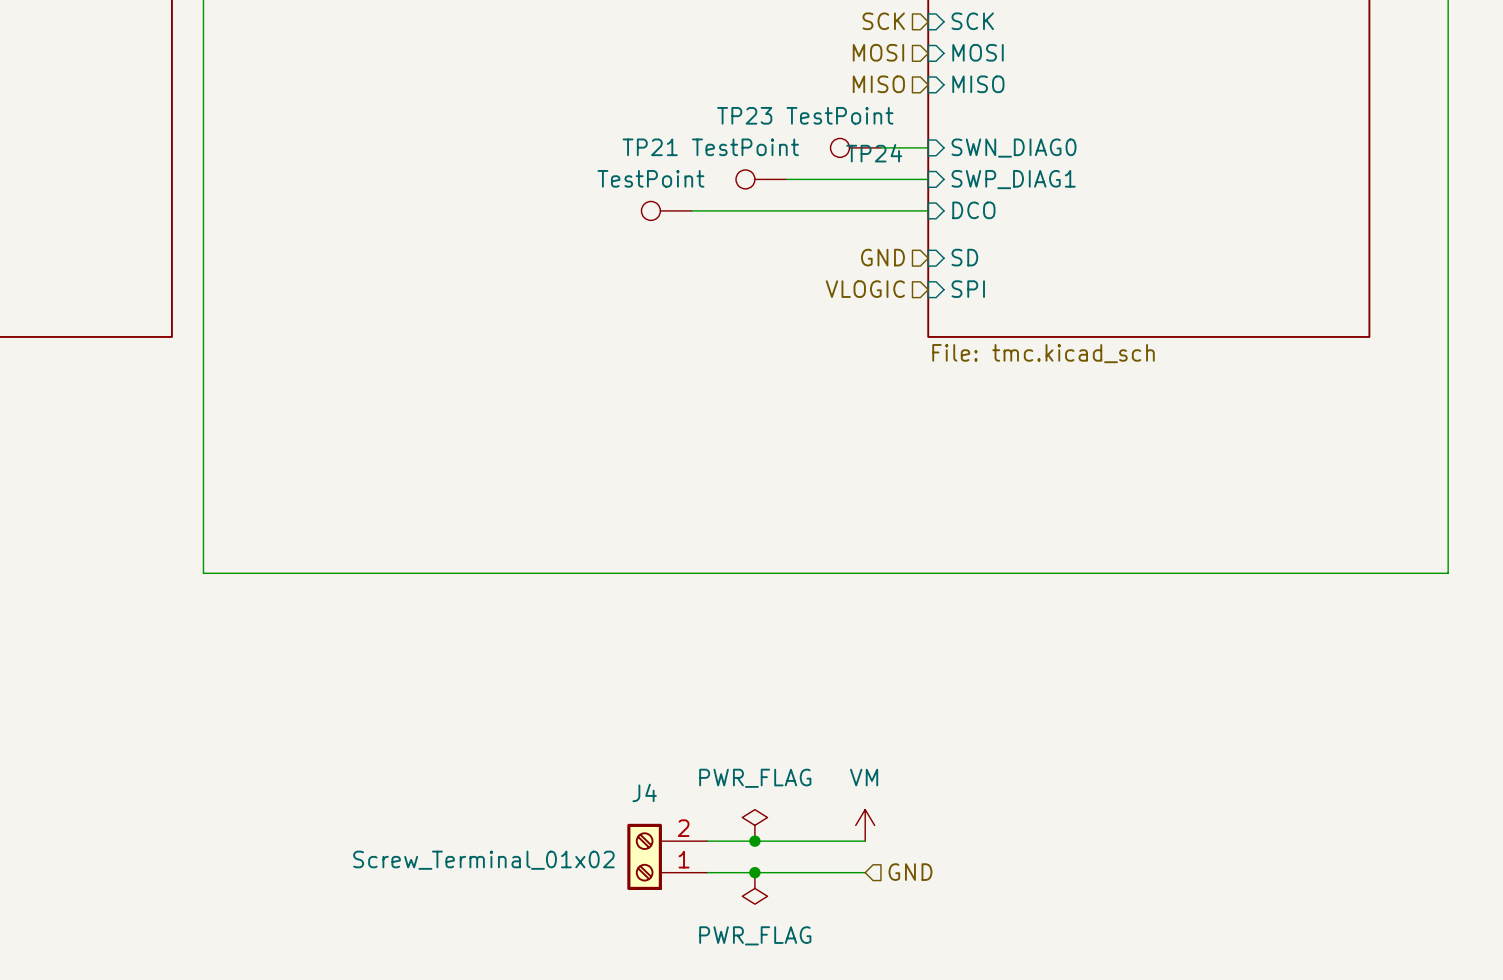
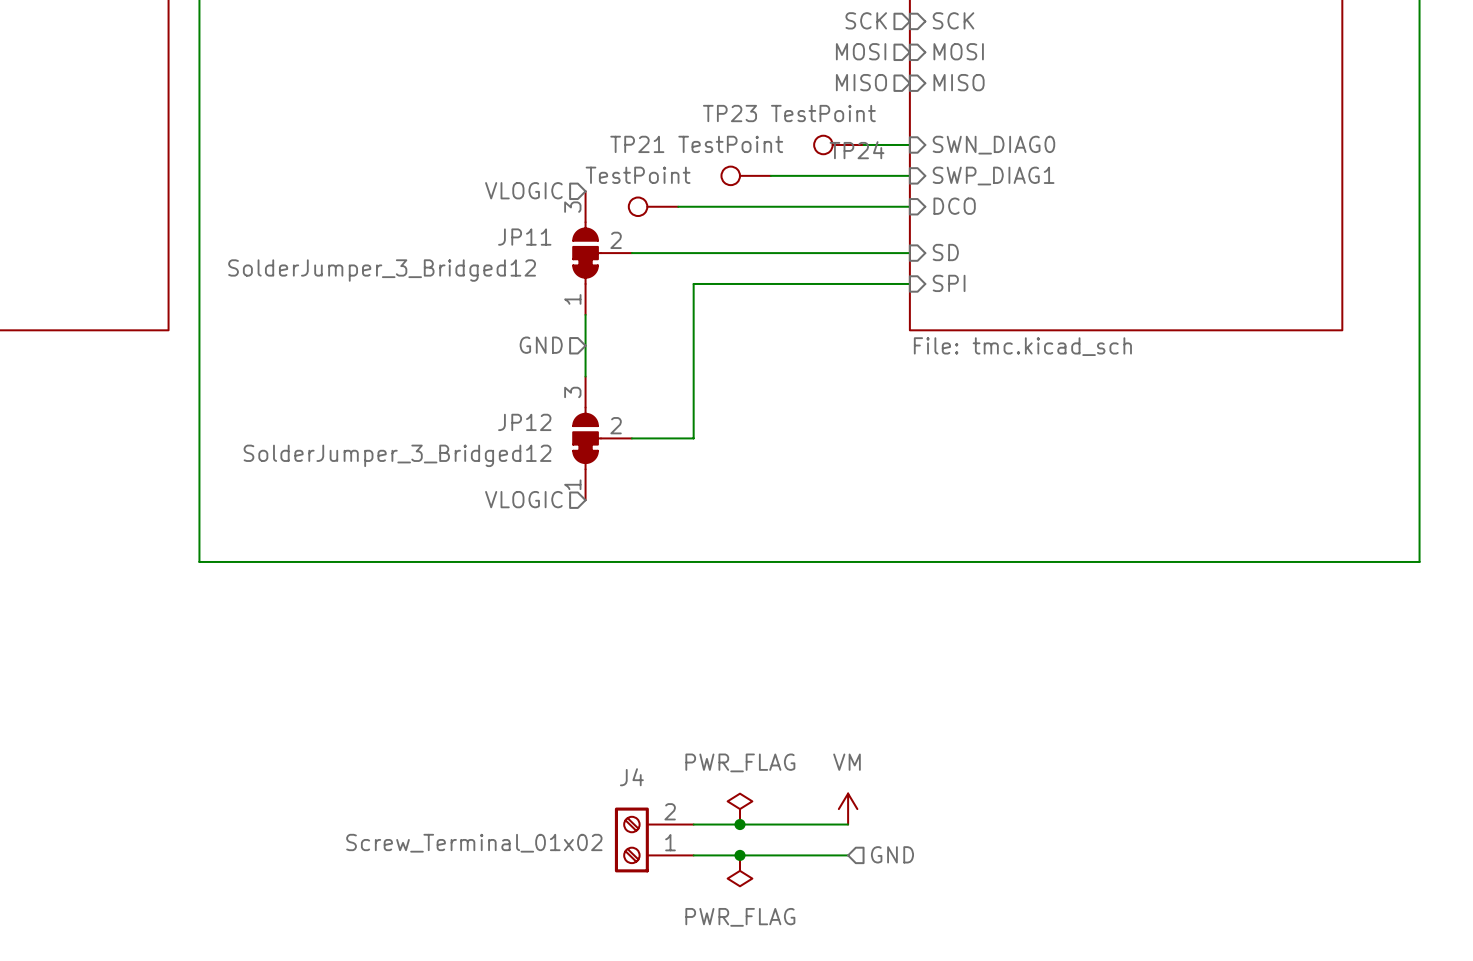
hierarchical label: none -> VLOGIC (523, 190)
hierarchical label: GND (882, 257) -> none
JP11: none -> SolderJumper_3_Bridged12 (602, 253)
wire: none -> (631, 253) (909, 253)
hierarchical label: VLOGIC (865, 289) -> none
wire: none -> (909, 283) (693, 283) (693, 438) (631, 438)
wire: none -> (585, 314) (585, 376)
hierarchical label: none -> GND (541, 345)
JP12: none -> SolderJumper_3_Bridged12 (602, 438)
hierarchical label: none -> VLOGIC (523, 499)

